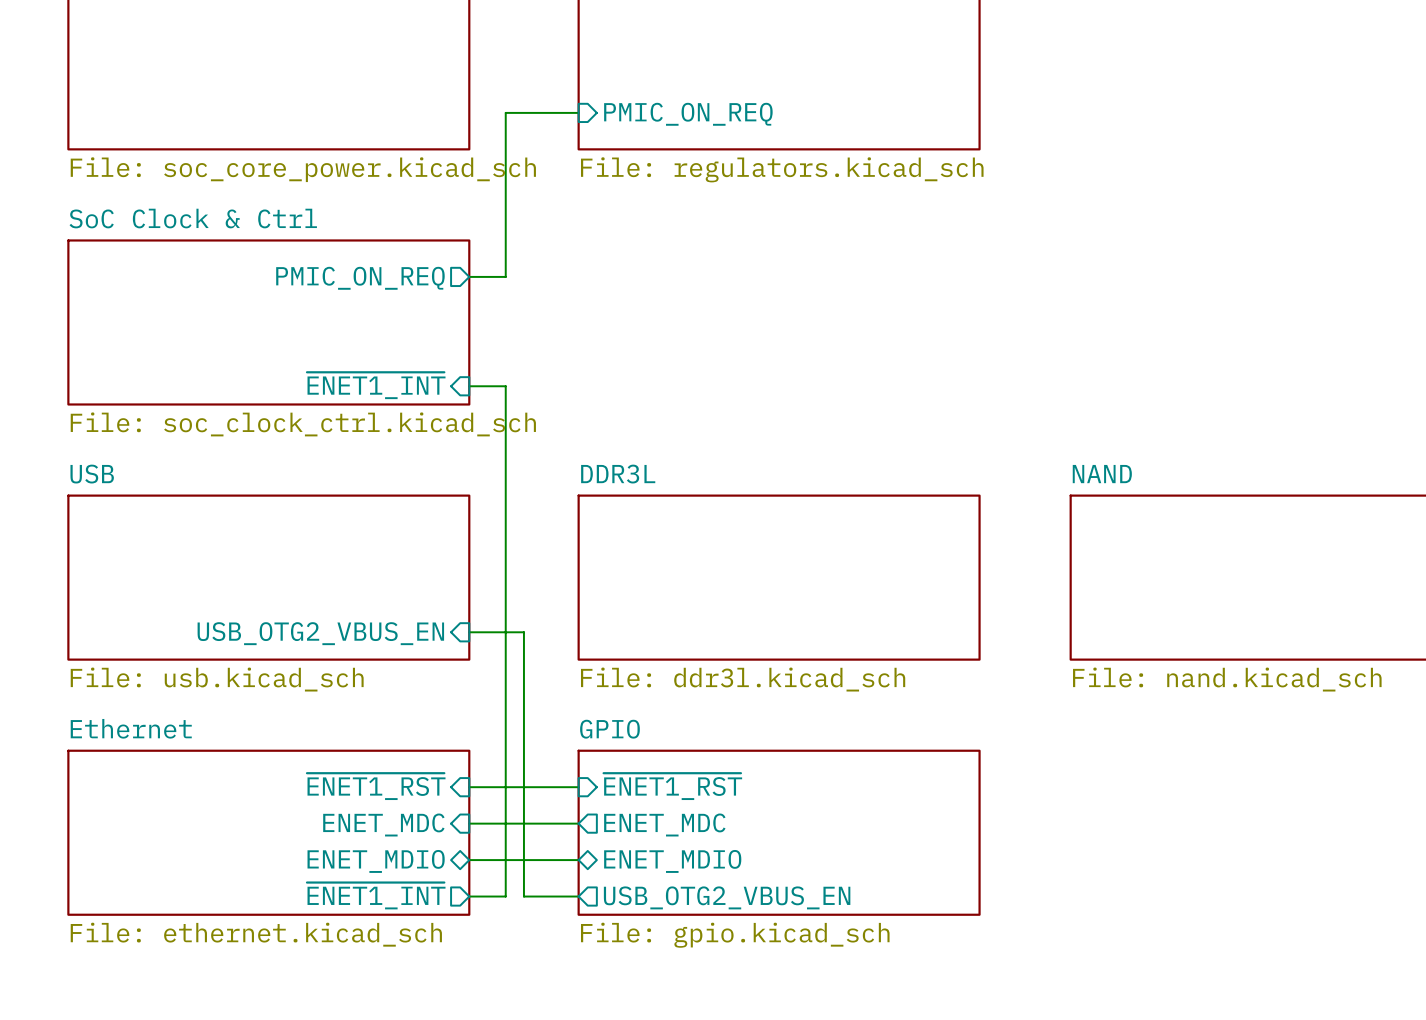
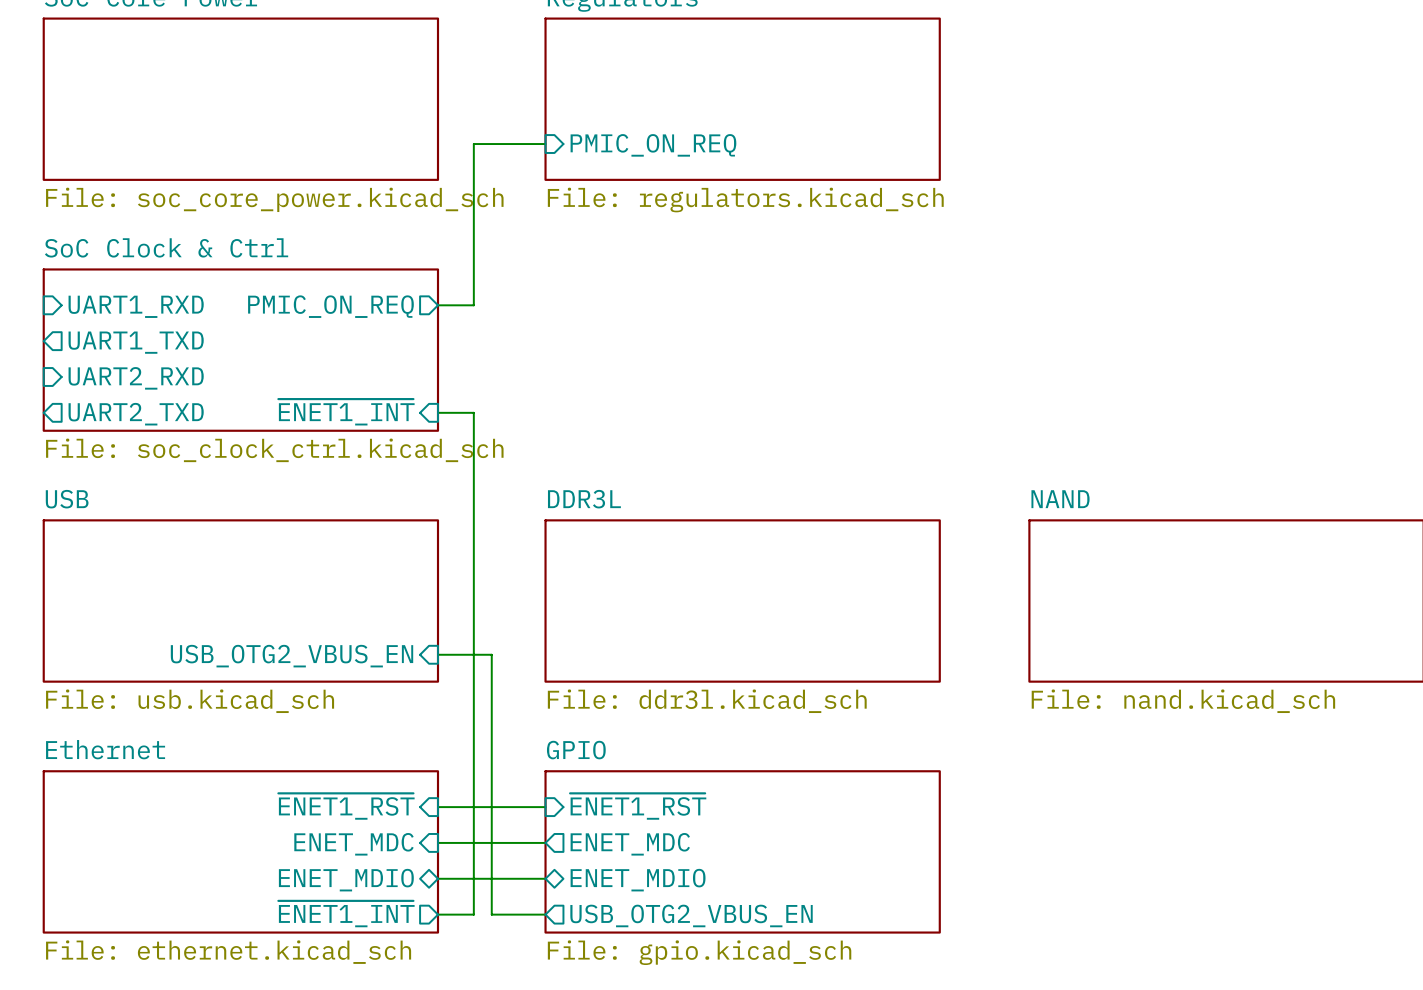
sheet pin: none -> UART1_RXD (136, 306)
sheet pin: none -> UART1_TXD (136, 342)
sheet pin: none -> UART2_RXD (136, 378)
sheet pin: none -> UART2_TXD (136, 414)

